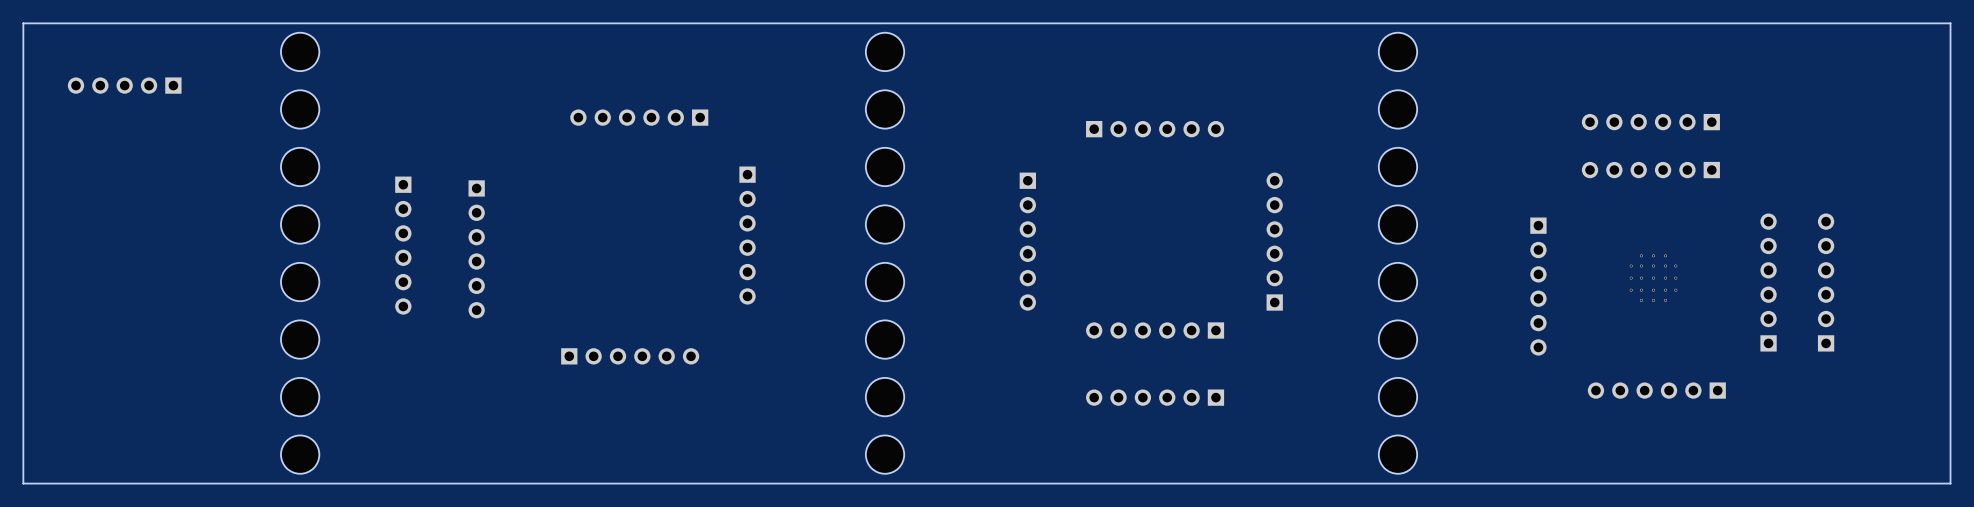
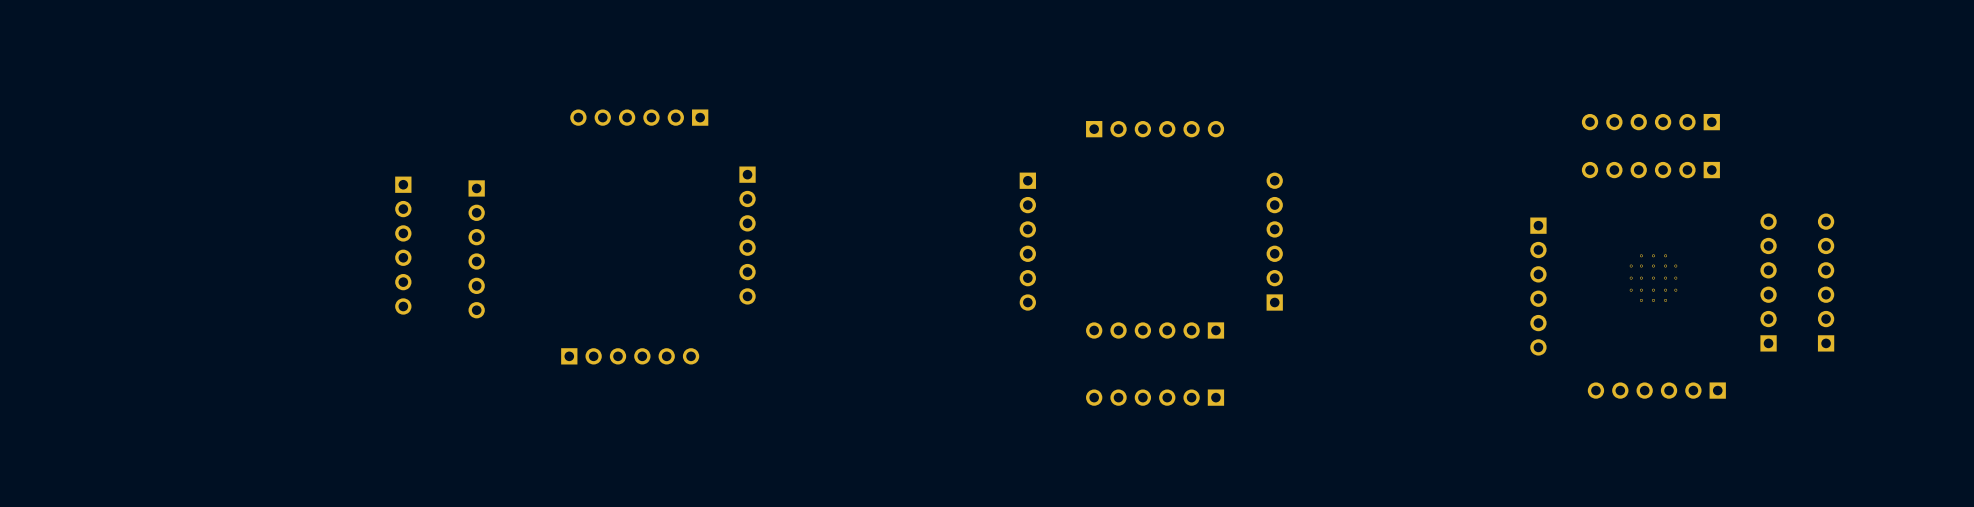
board edge: (1950, 23) (23, 23) (23, 483) (1950, 483) (1950, 23) -> none
part: (300, 51) -> none
part: (885, 51) -> none
part: (1397, 51) -> none
part: (124, 85) -> none
part: (300, 109) -> none
part: (885, 109) -> none
part: (1397, 109) -> none
part: (300, 166) -> none
part: (885, 166) -> none
part: (1397, 166) -> none
part: (300, 224) -> none
part: (885, 224) -> none
part: (1397, 224) -> none
part: (300, 282) -> none
part: (885, 282) -> none
part: (1397, 282) -> none
part: (300, 339) -> none
part: (885, 339) -> none
part: (1397, 339) -> none
part: (300, 397) -> none
part: (885, 397) -> none
part: (1397, 397) -> none
part: (300, 454) -> none
part: (885, 454) -> none
part: (1397, 454) -> none

